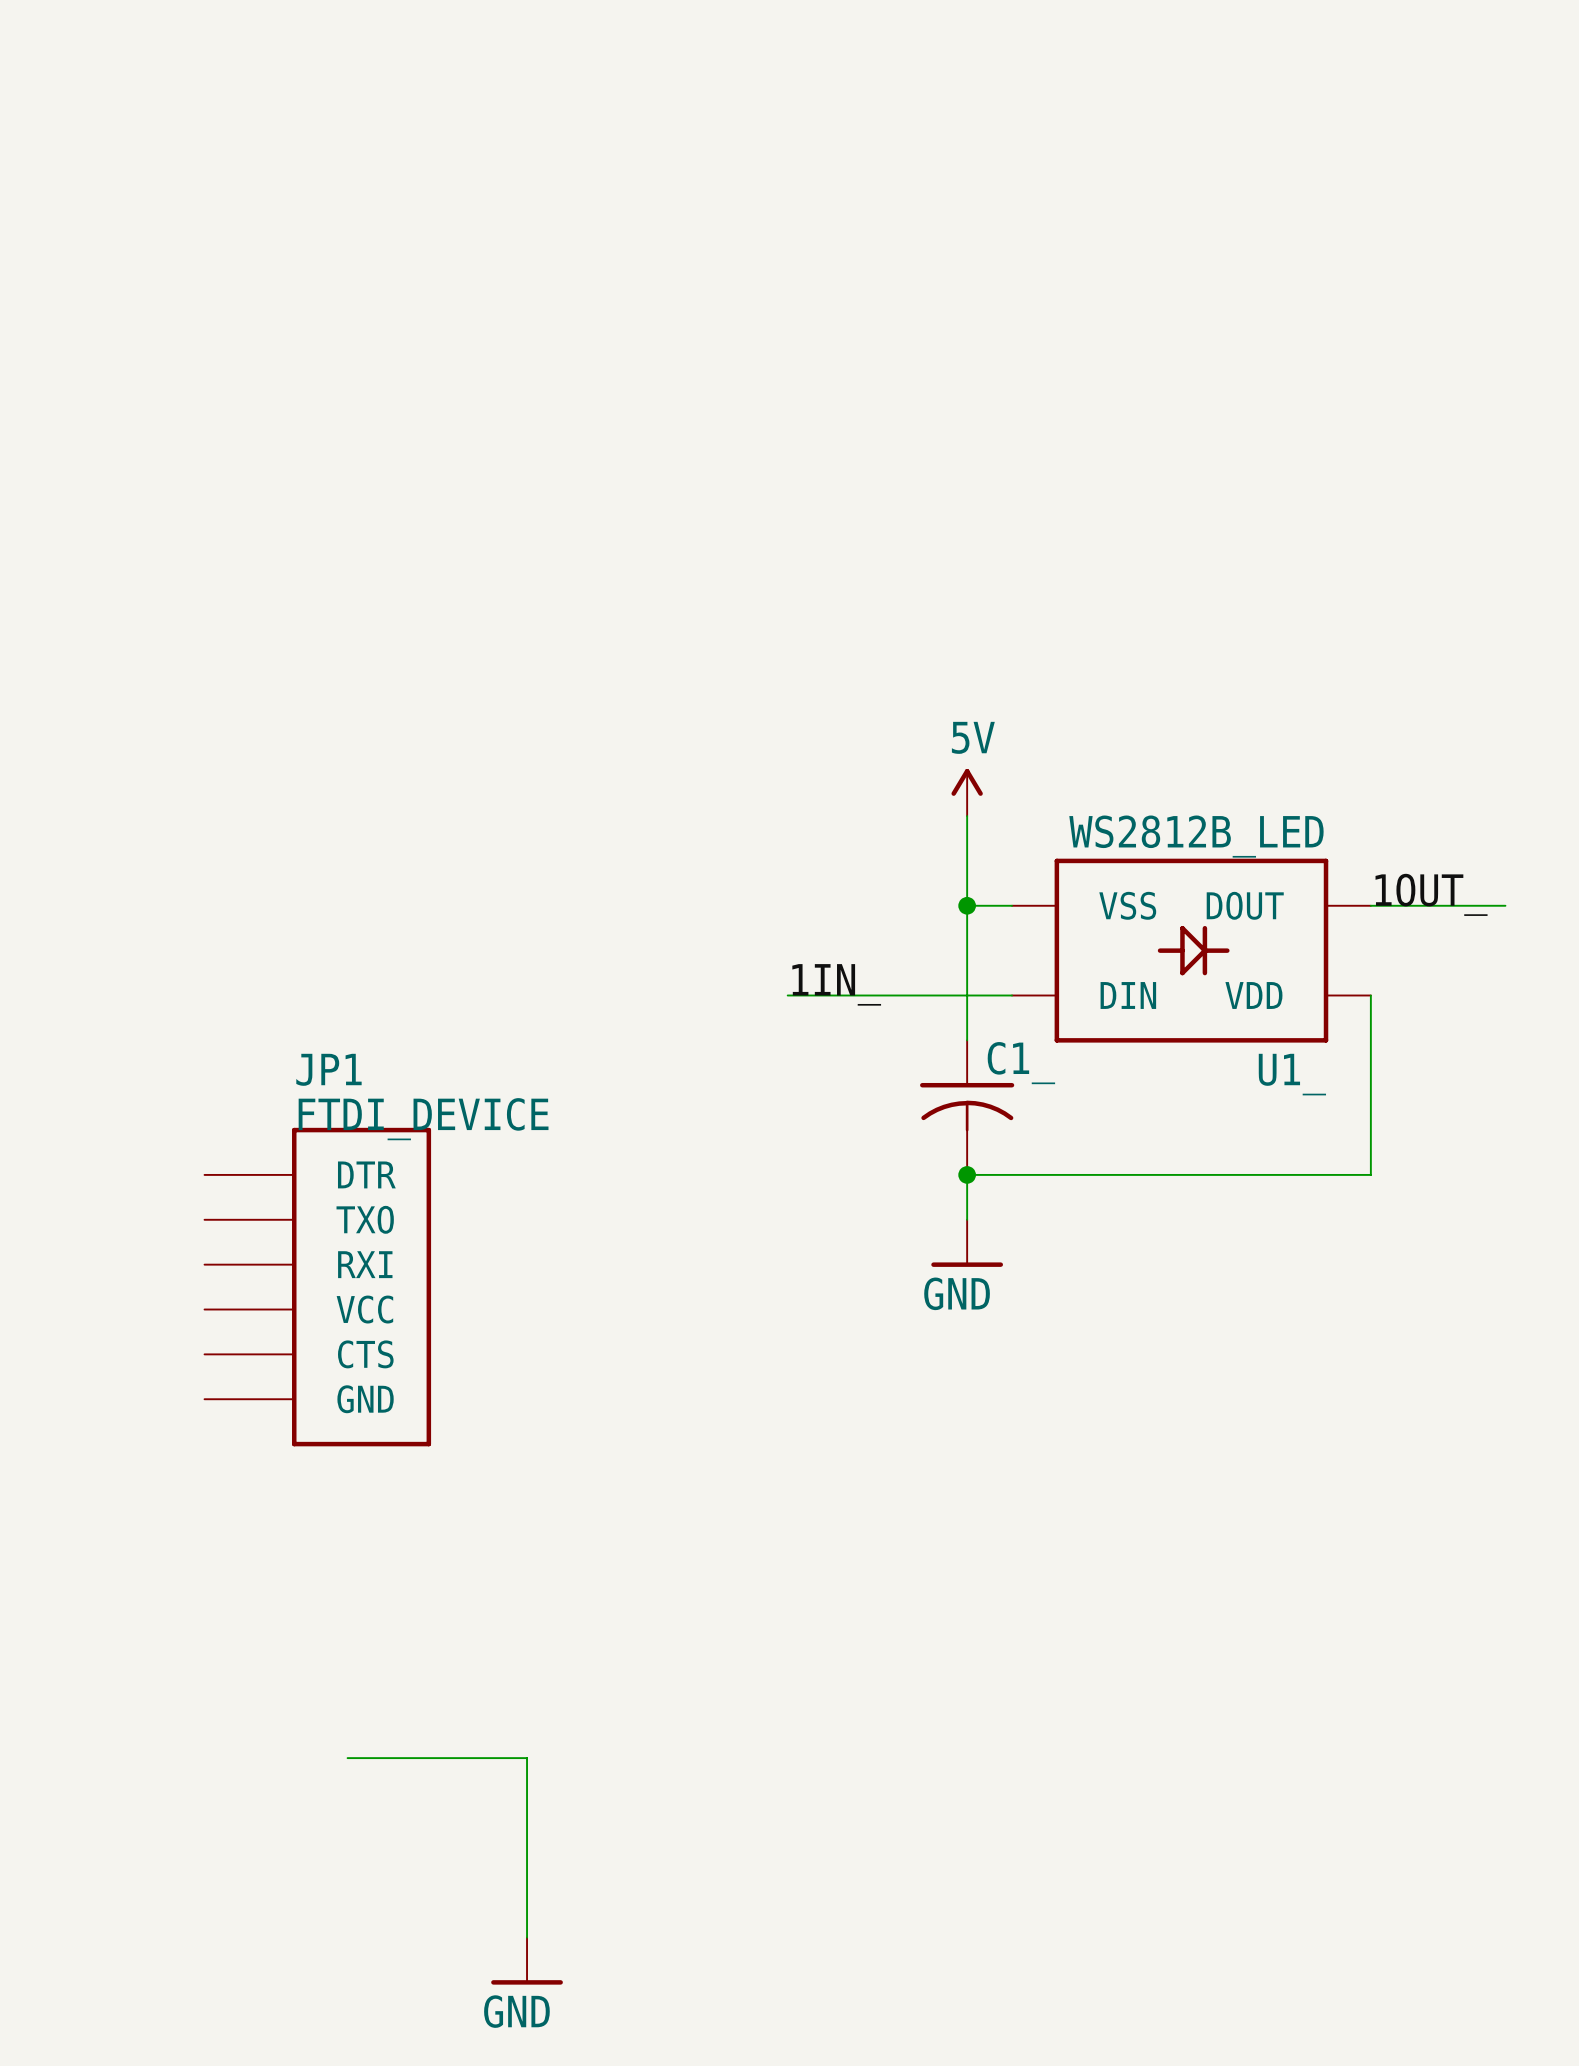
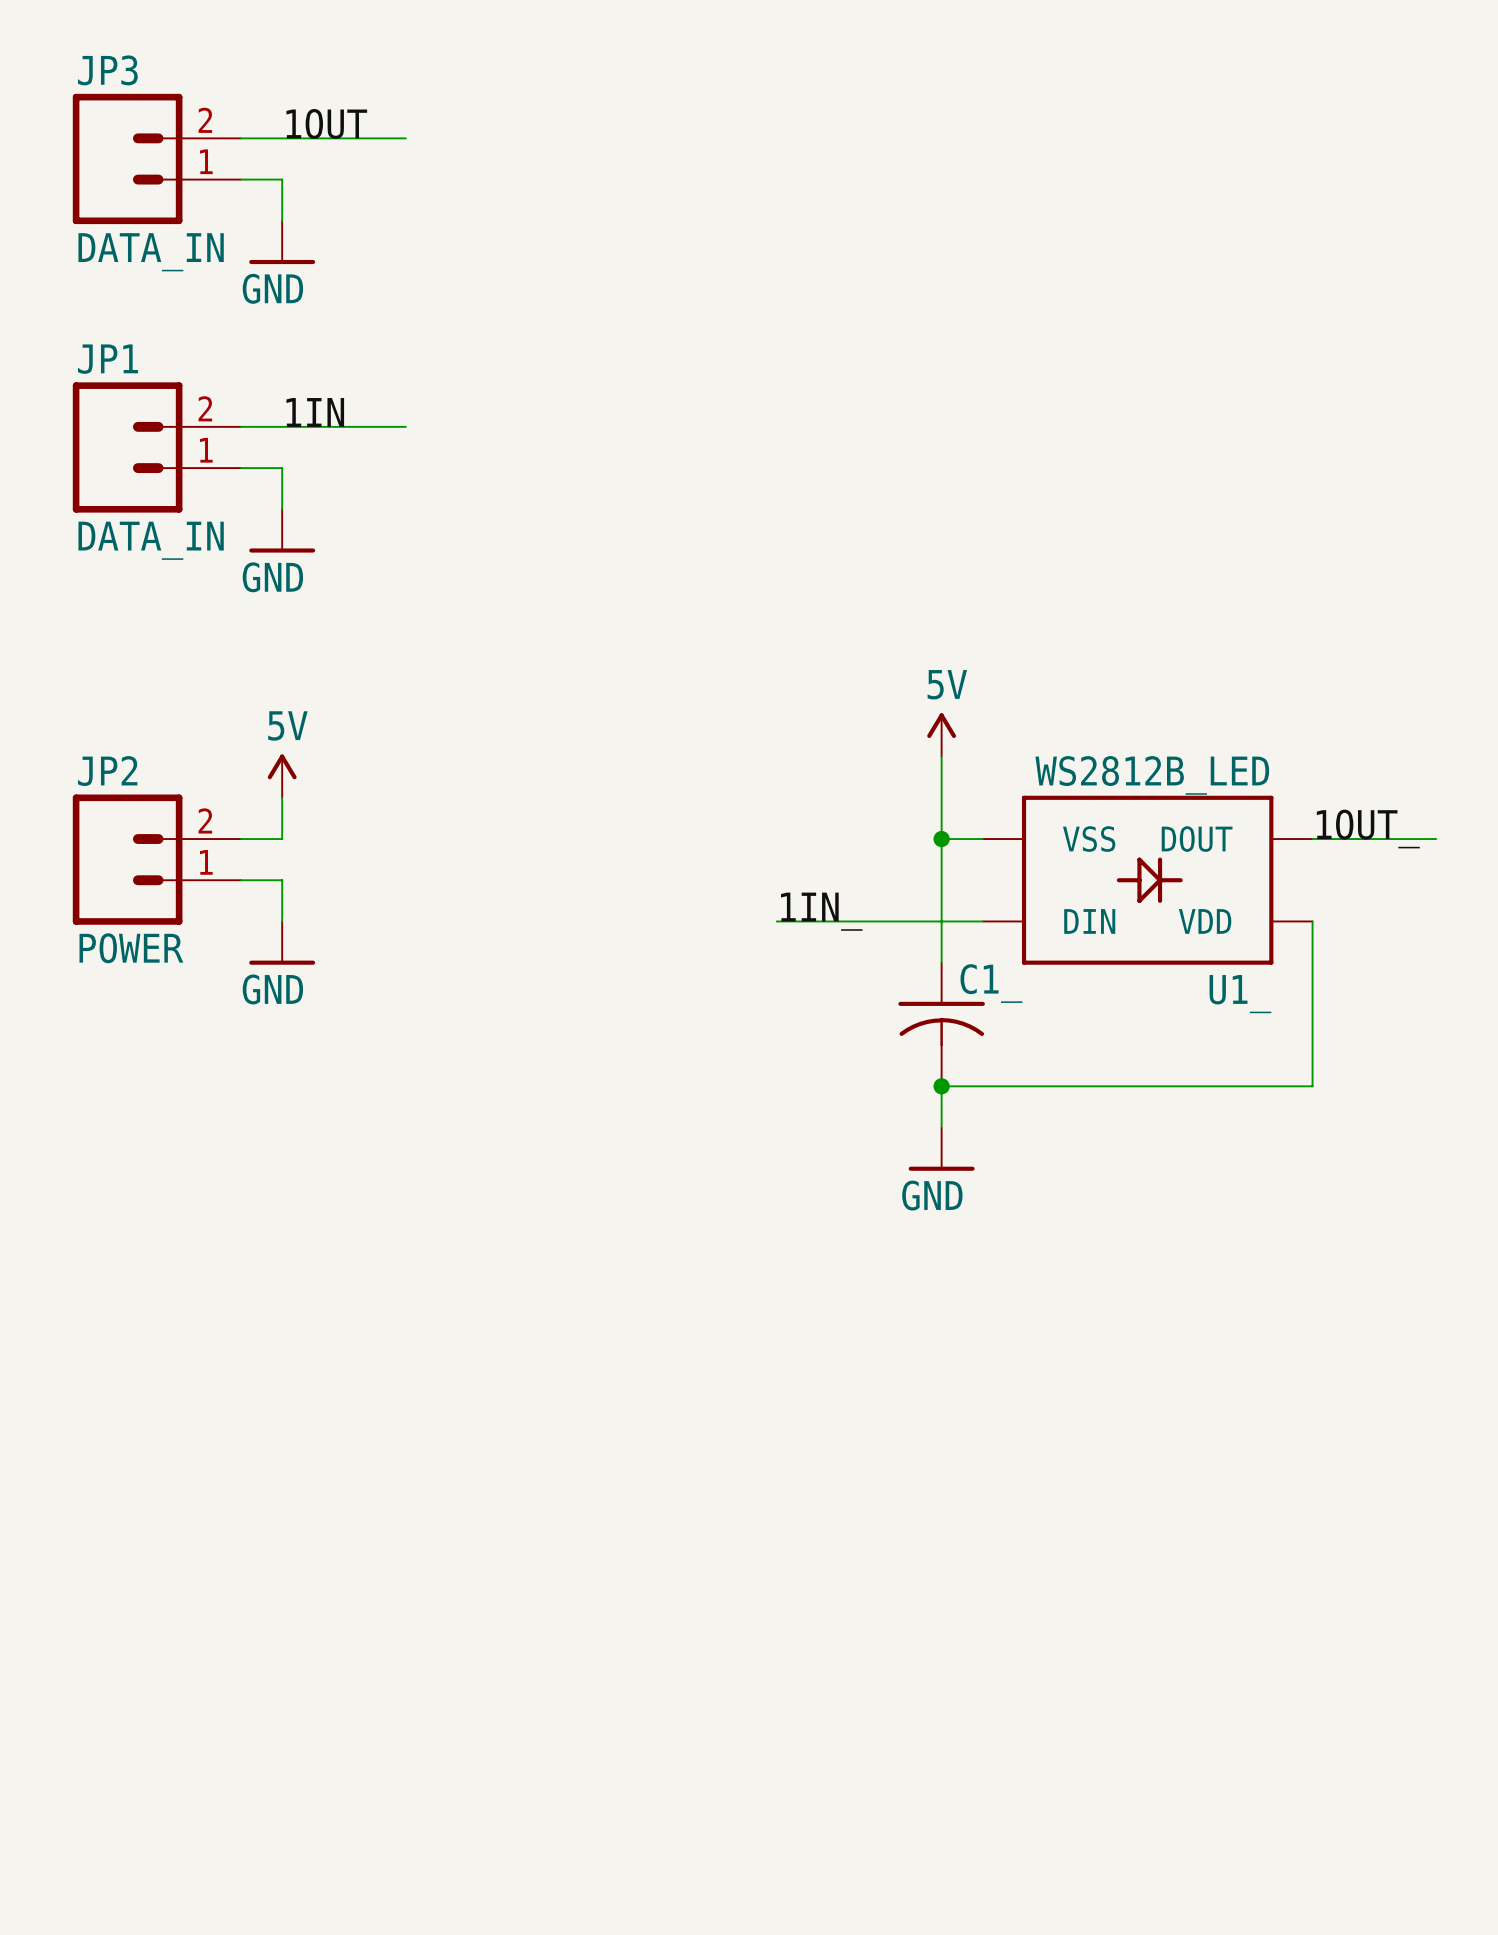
label: none -> 1OUT (326, 123)
wire: none -> (240, 138) (405, 138)
JP3: none -> DATA_IN (156, 158)
wire: none -> (240, 179) (282, 179) (282, 220)
power symbol: none -> GND (282, 242)
label: none -> 1IN (315, 412)
wire: none -> (240, 426) (405, 426)
wire: none -> (240, 468) (282, 468) (282, 509)
power symbol: none -> GND (282, 530)
power symbol: none -> 5V (282, 776)
wire: none -> (282, 797) (282, 839) (240, 839)
JP2: none -> POWER (156, 859)
wire: none -> (240, 880) (282, 880) (282, 921)
power symbol: none -> GND (282, 943)
JP1 name position: JP1 (328, 1069) -> JP1 (108, 359)
JP1 value: FTDI_DEVICE (423, 1119) -> DATA_IN (151, 540)
JP1 symbol: [204, 1127, 432, 1447] -> [72, 382, 241, 513]
wire: (347, 1758) (527, 1758) (527, 1937) -> none
power symbol: GND (527, 1961) -> none

